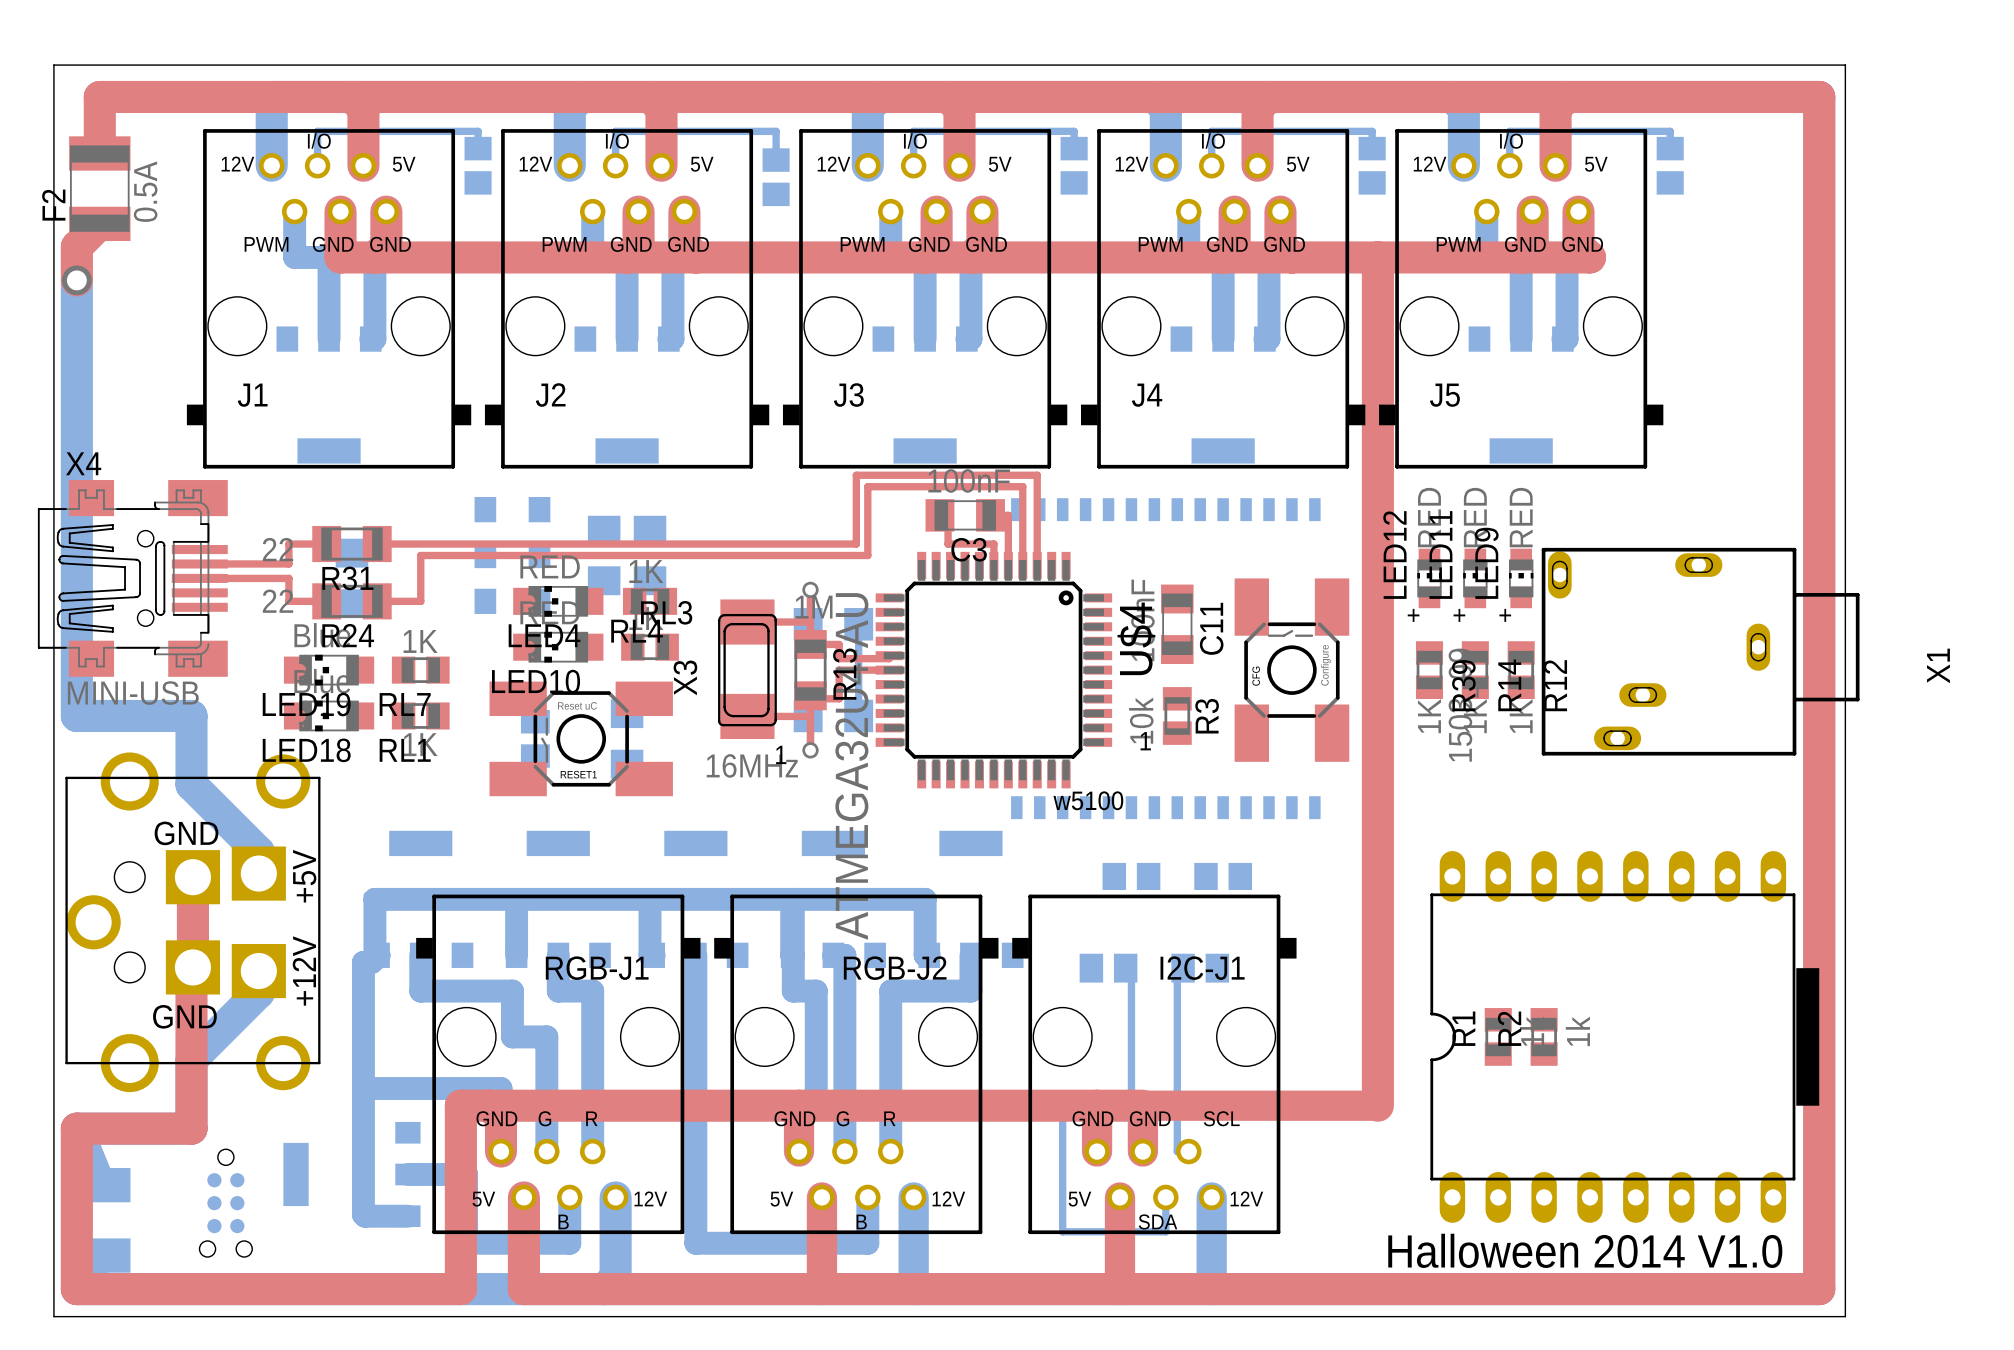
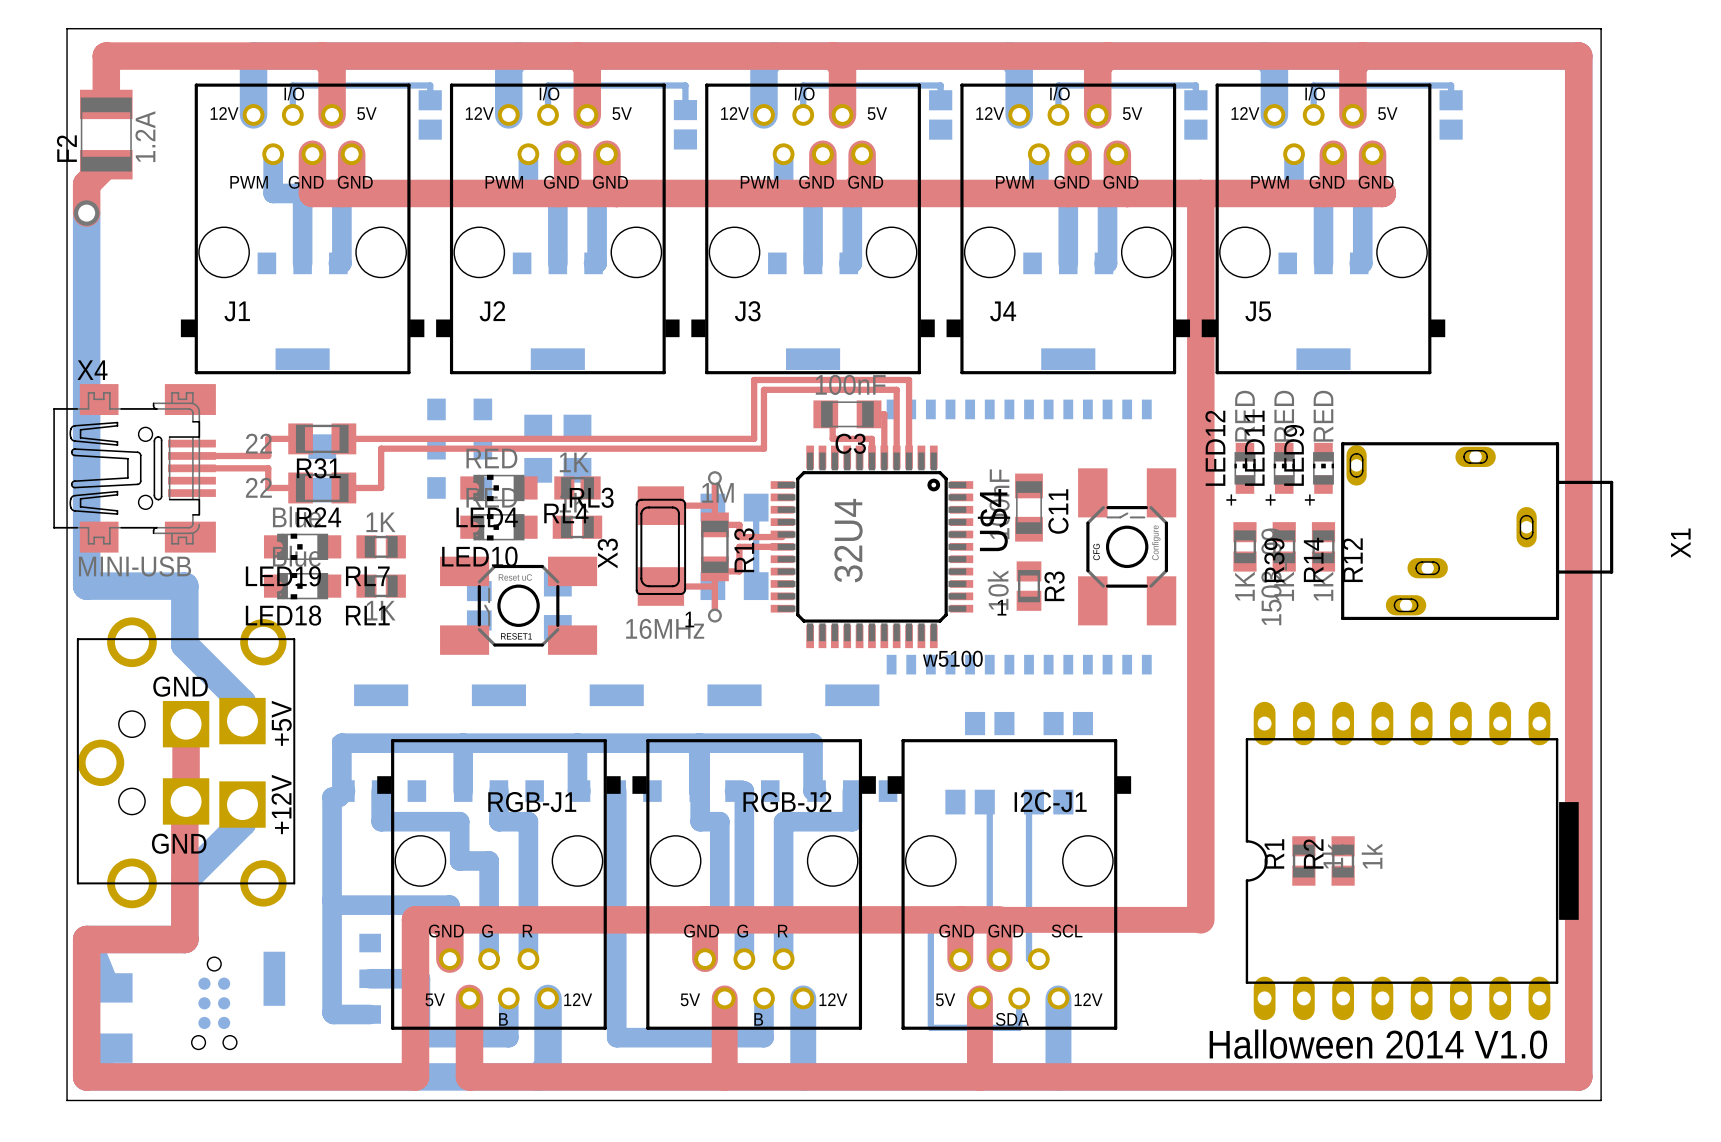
F2 value: 0.5A (145, 191) -> 1.2A (145, 136)
U$4 value: ATMEGA32U4-AU (851, 766) -> 32U4 (848, 540)

